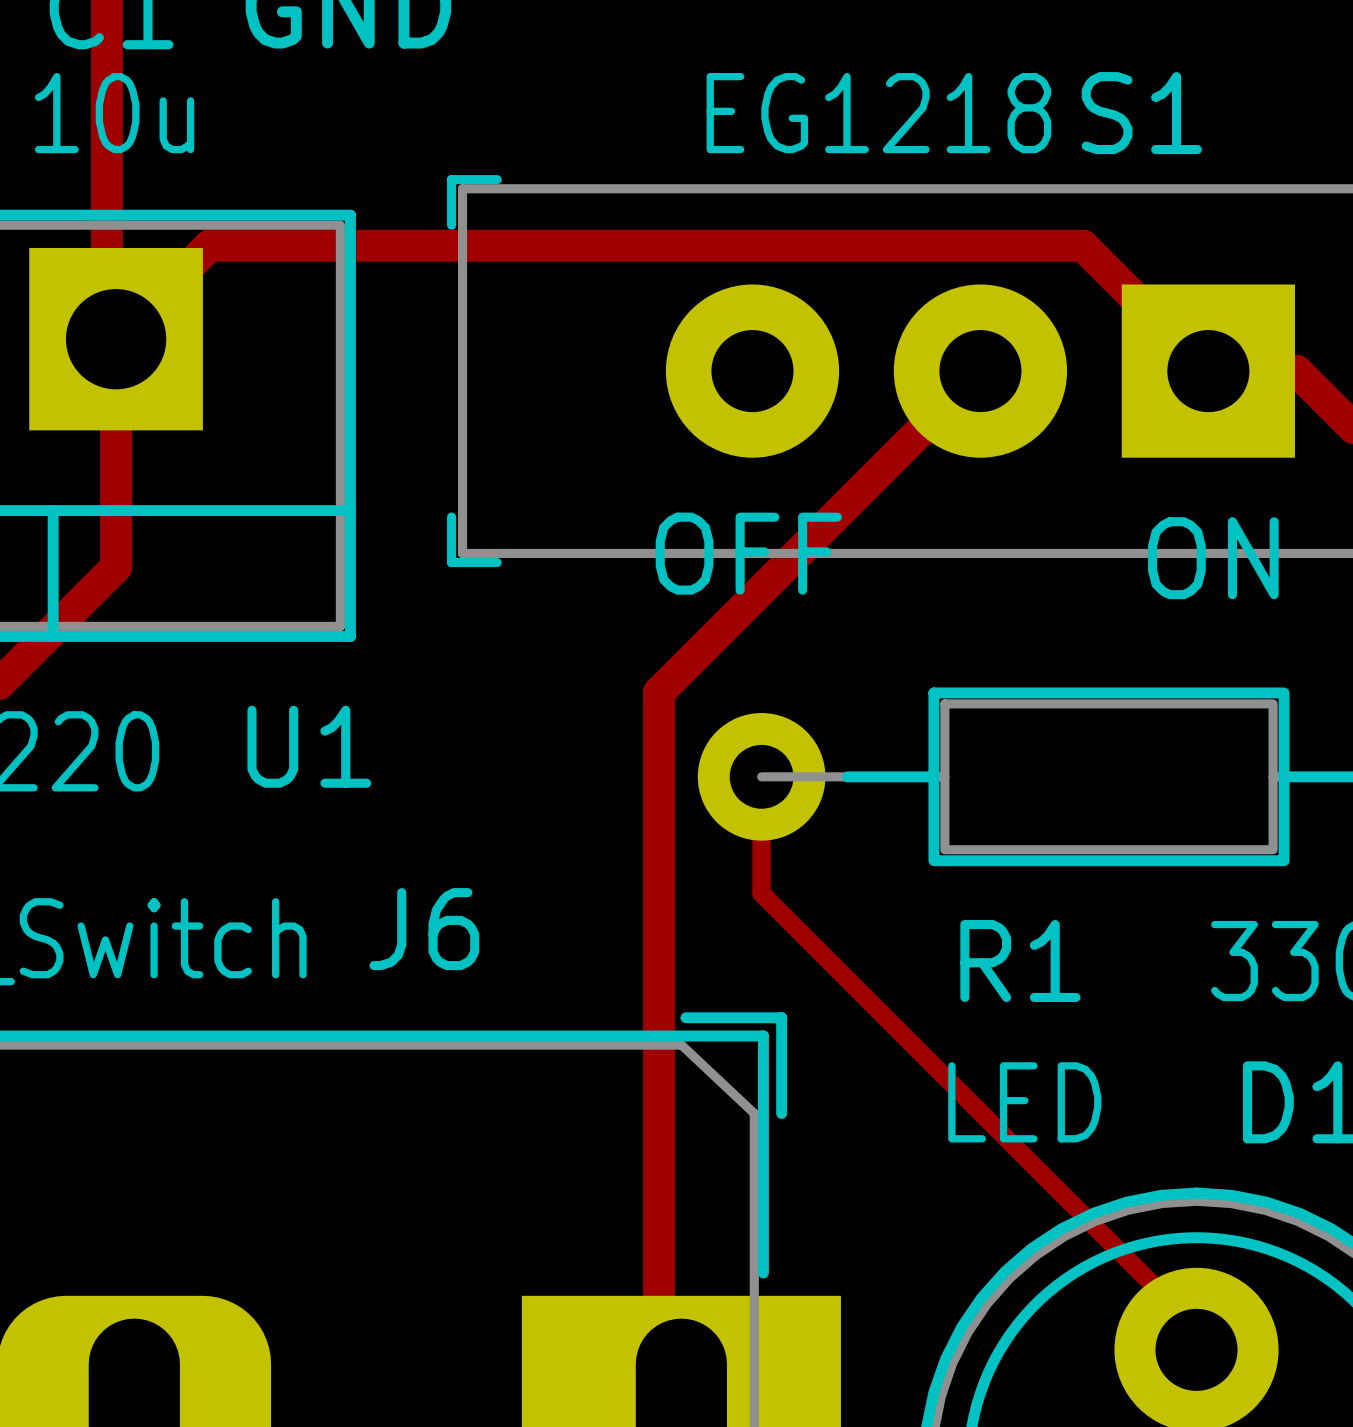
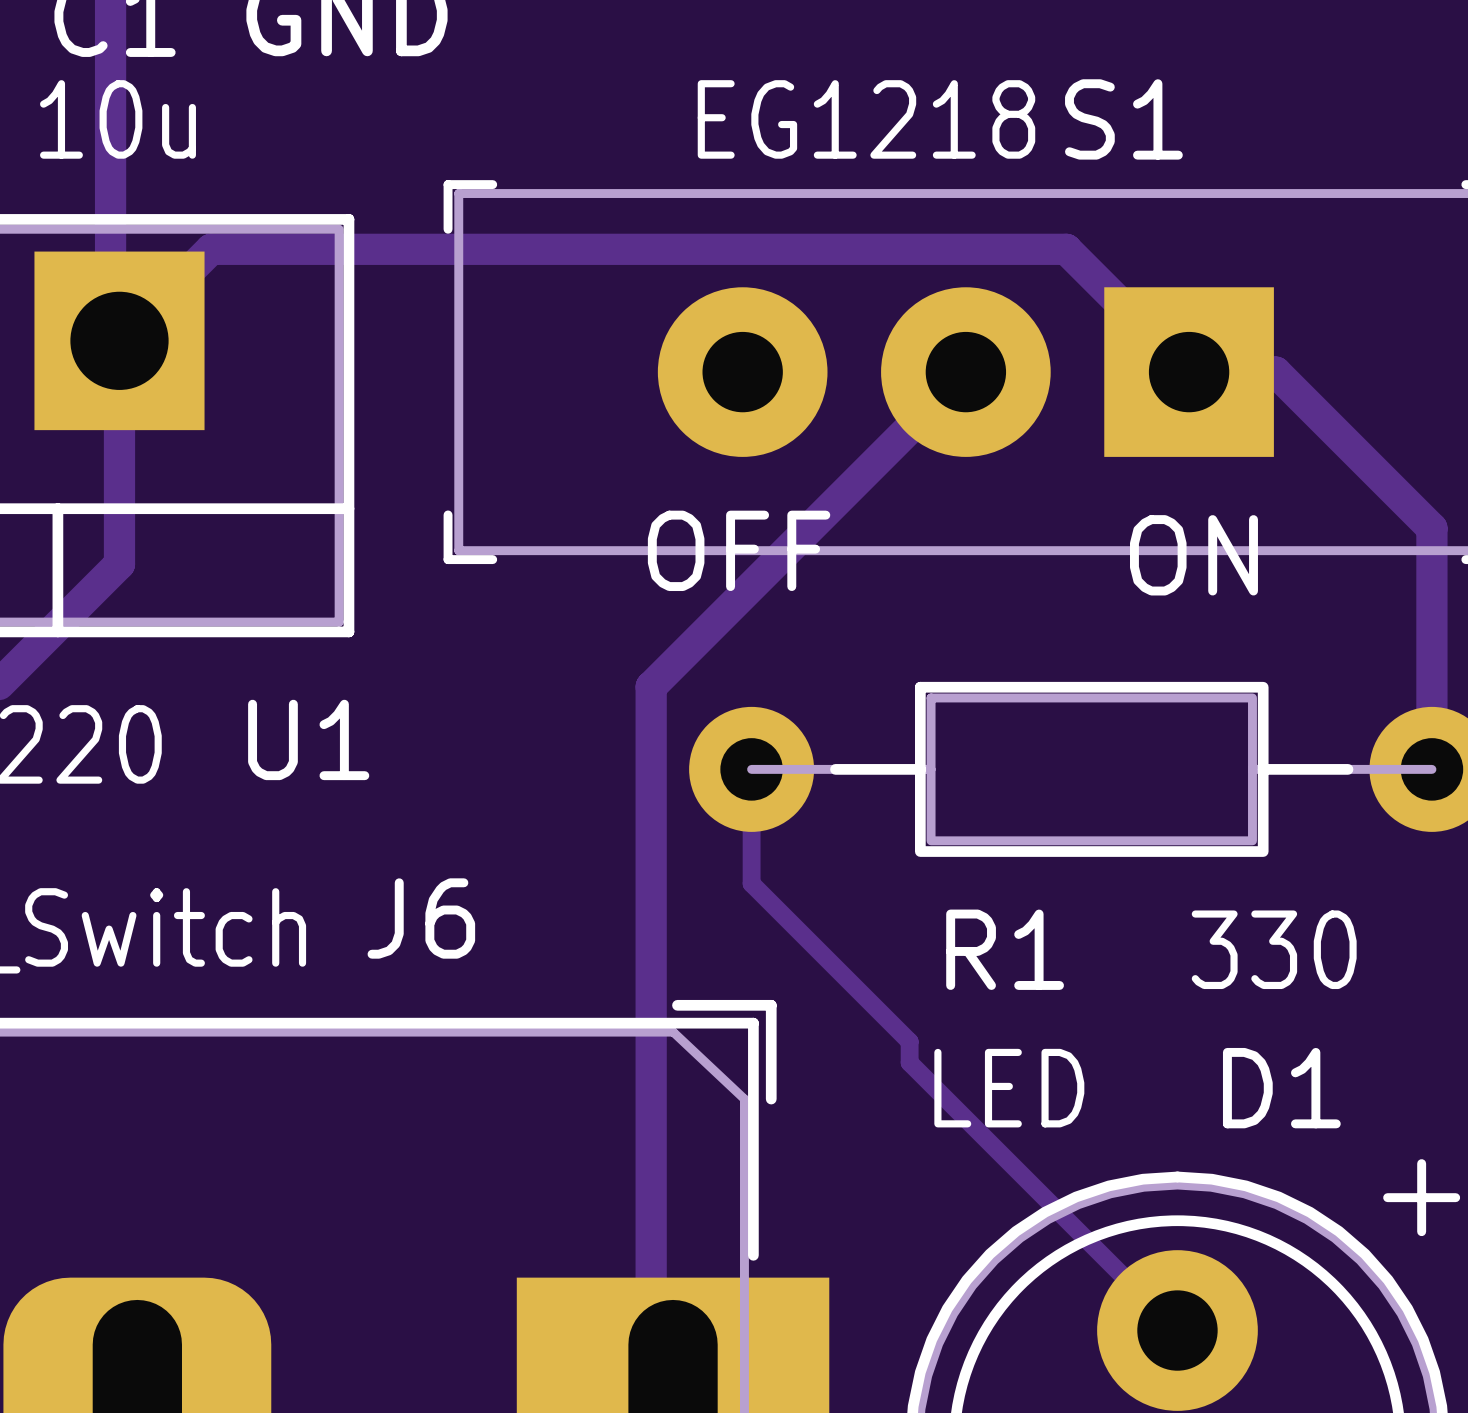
track: (922, 1054) (1196, 1328) (1196, 1349) -> (909, 1041) (909, 1062) (1177, 1330)

